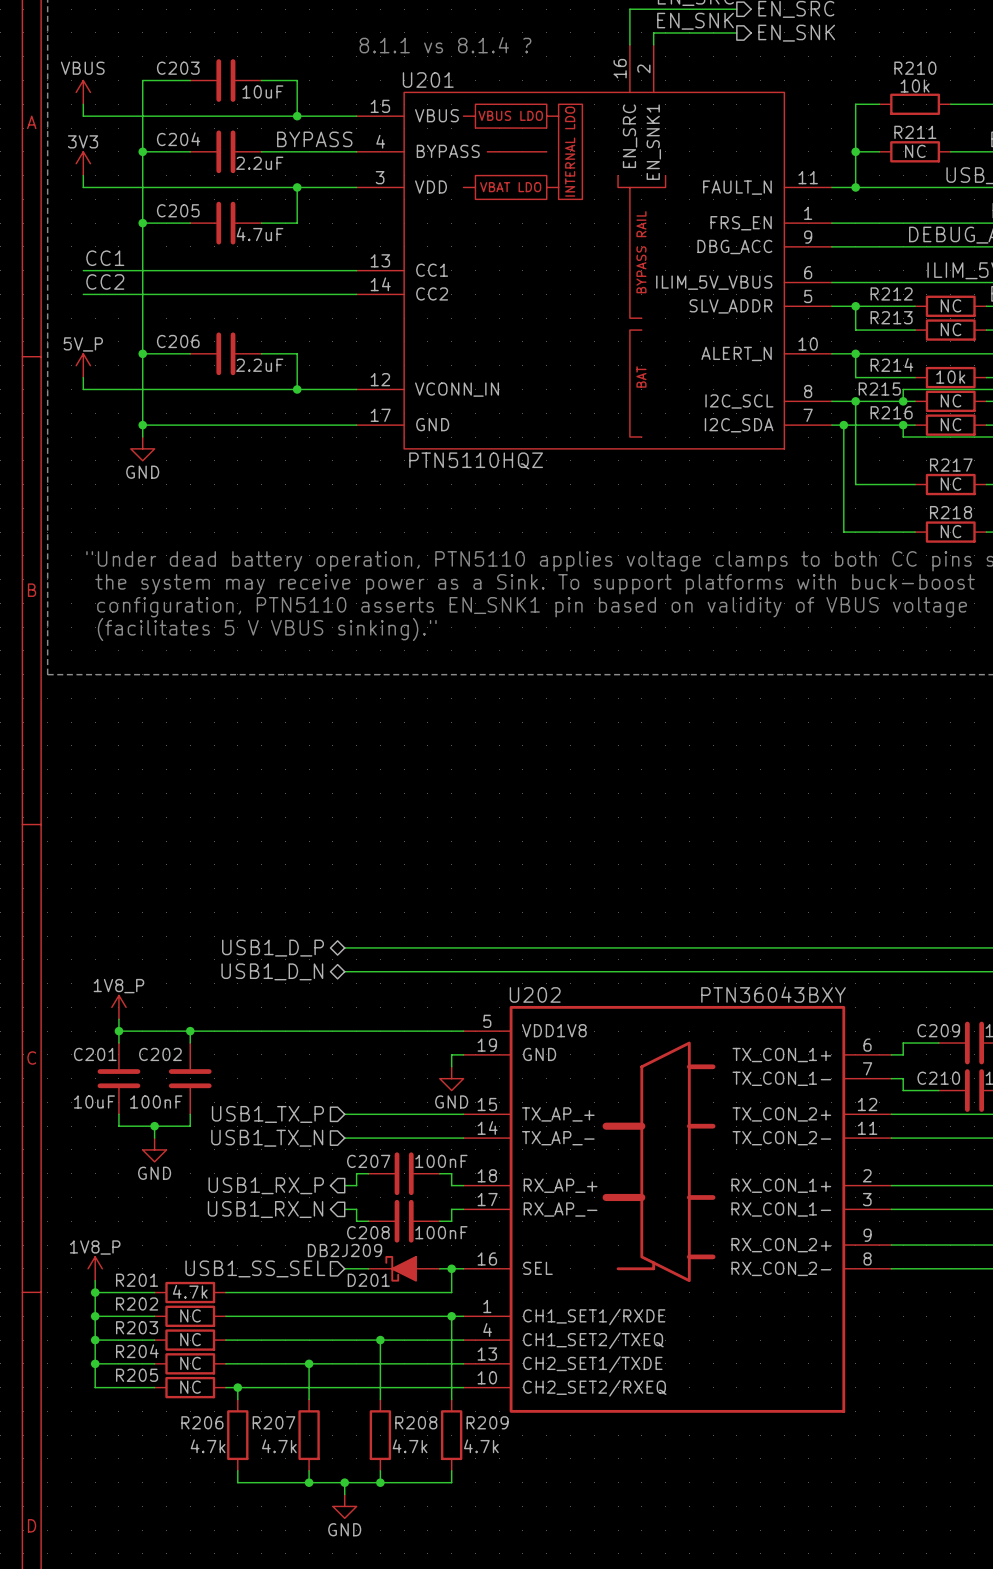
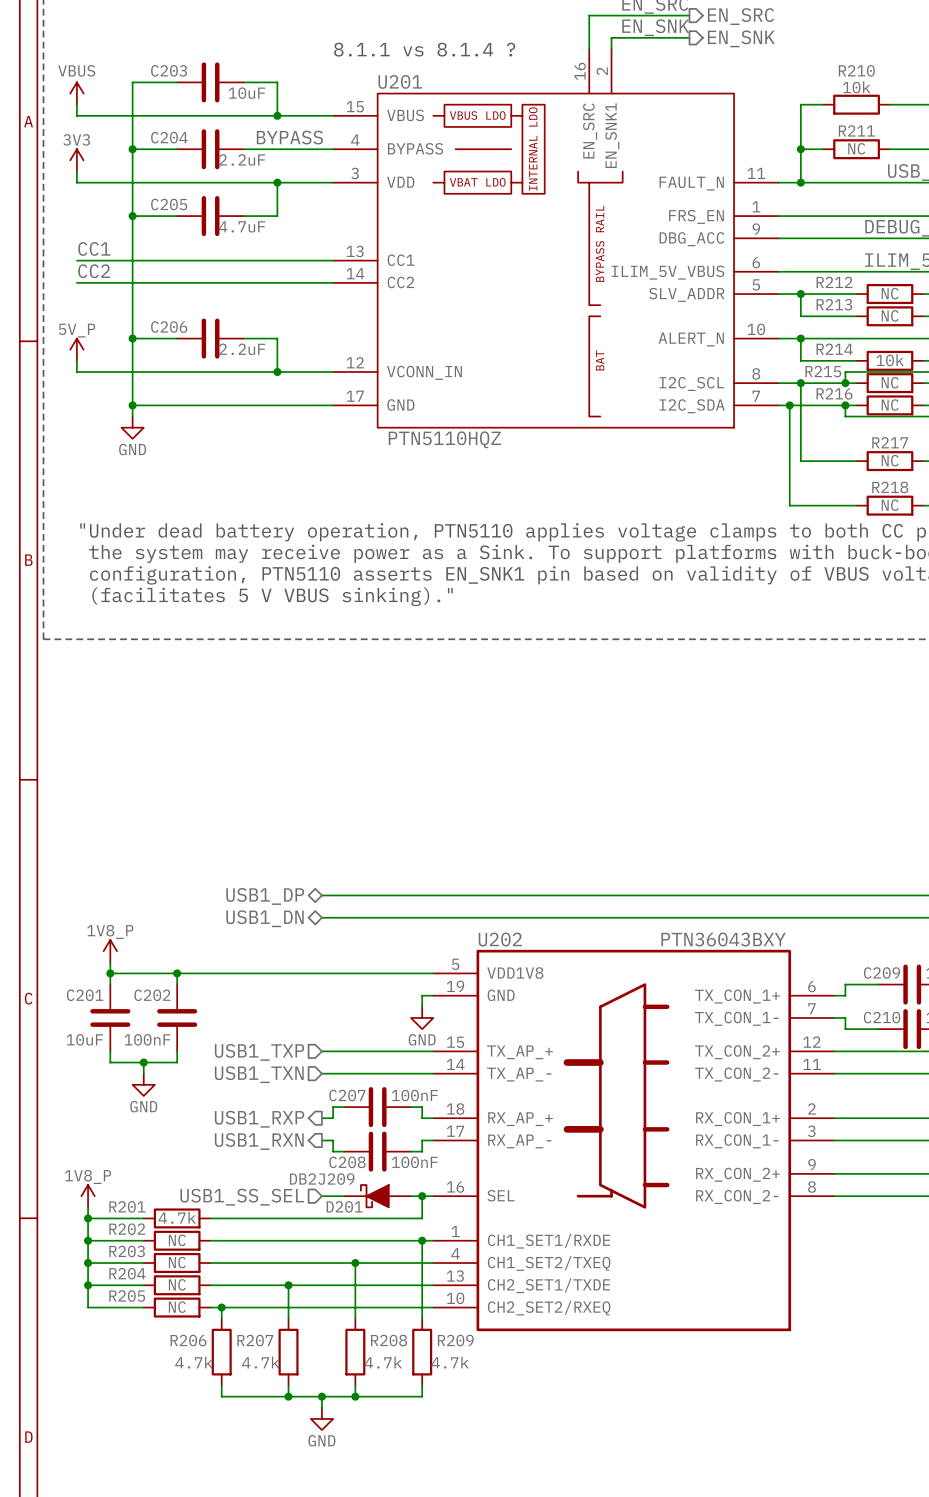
hierarchical label: USB1_D_P (273, 948) -> USB1_DP (265, 896)
hierarchical label: USB1_D_N (272, 971) -> USB1_DN (265, 918)
hierarchical label: USB1_TX_P (267, 1114) -> USB1_TXP (259, 1052)
hierarchical label: USB1_TX_N (267, 1138) -> USB1_TXN (259, 1074)
hierarchical label: USB1_RX_P (266, 1185) -> USB1_RXP (259, 1119)
hierarchical label: USB1_RX_N (265, 1209) -> USB1_RXN (259, 1141)

